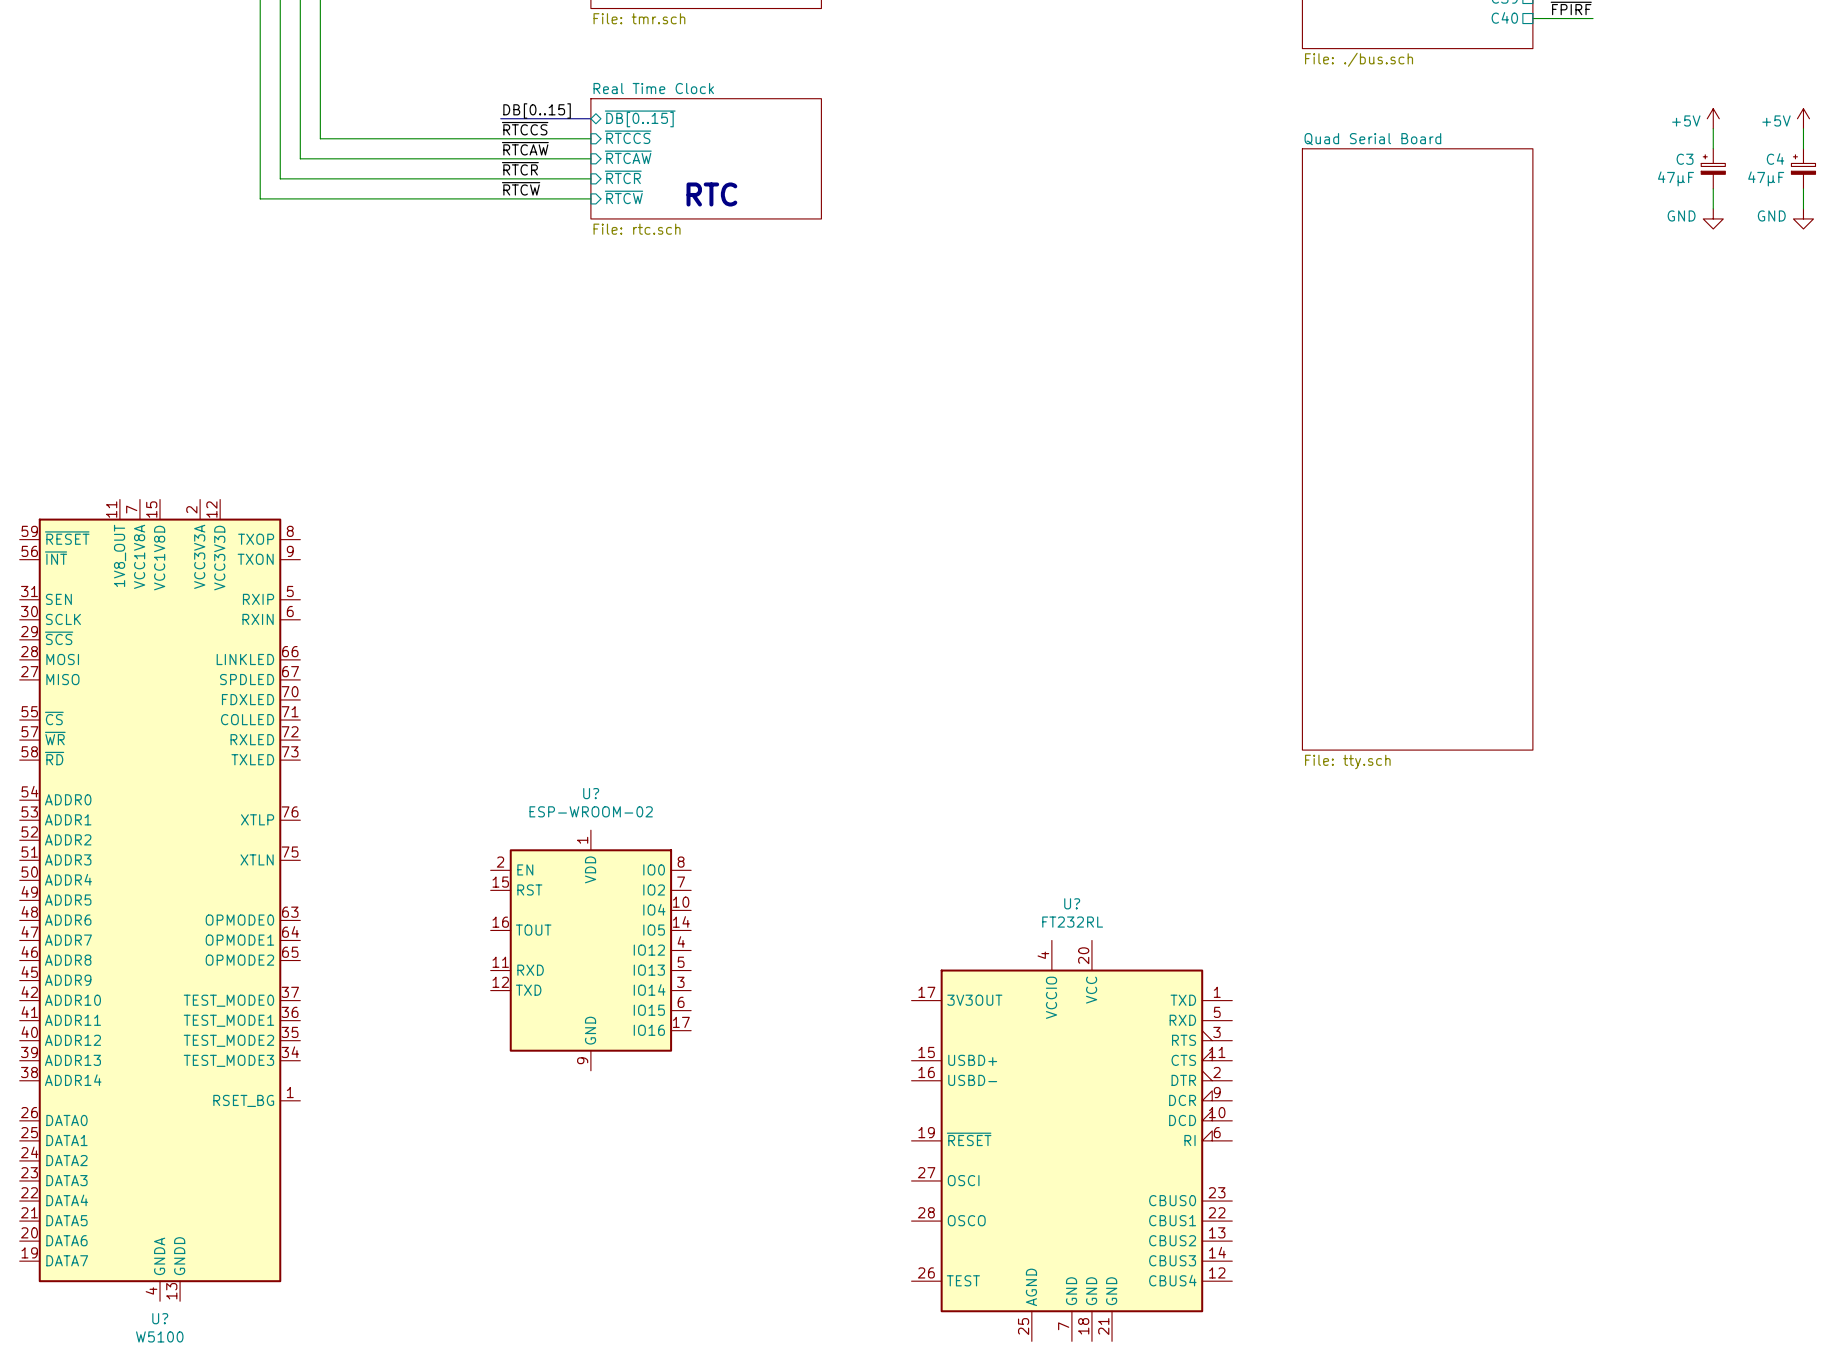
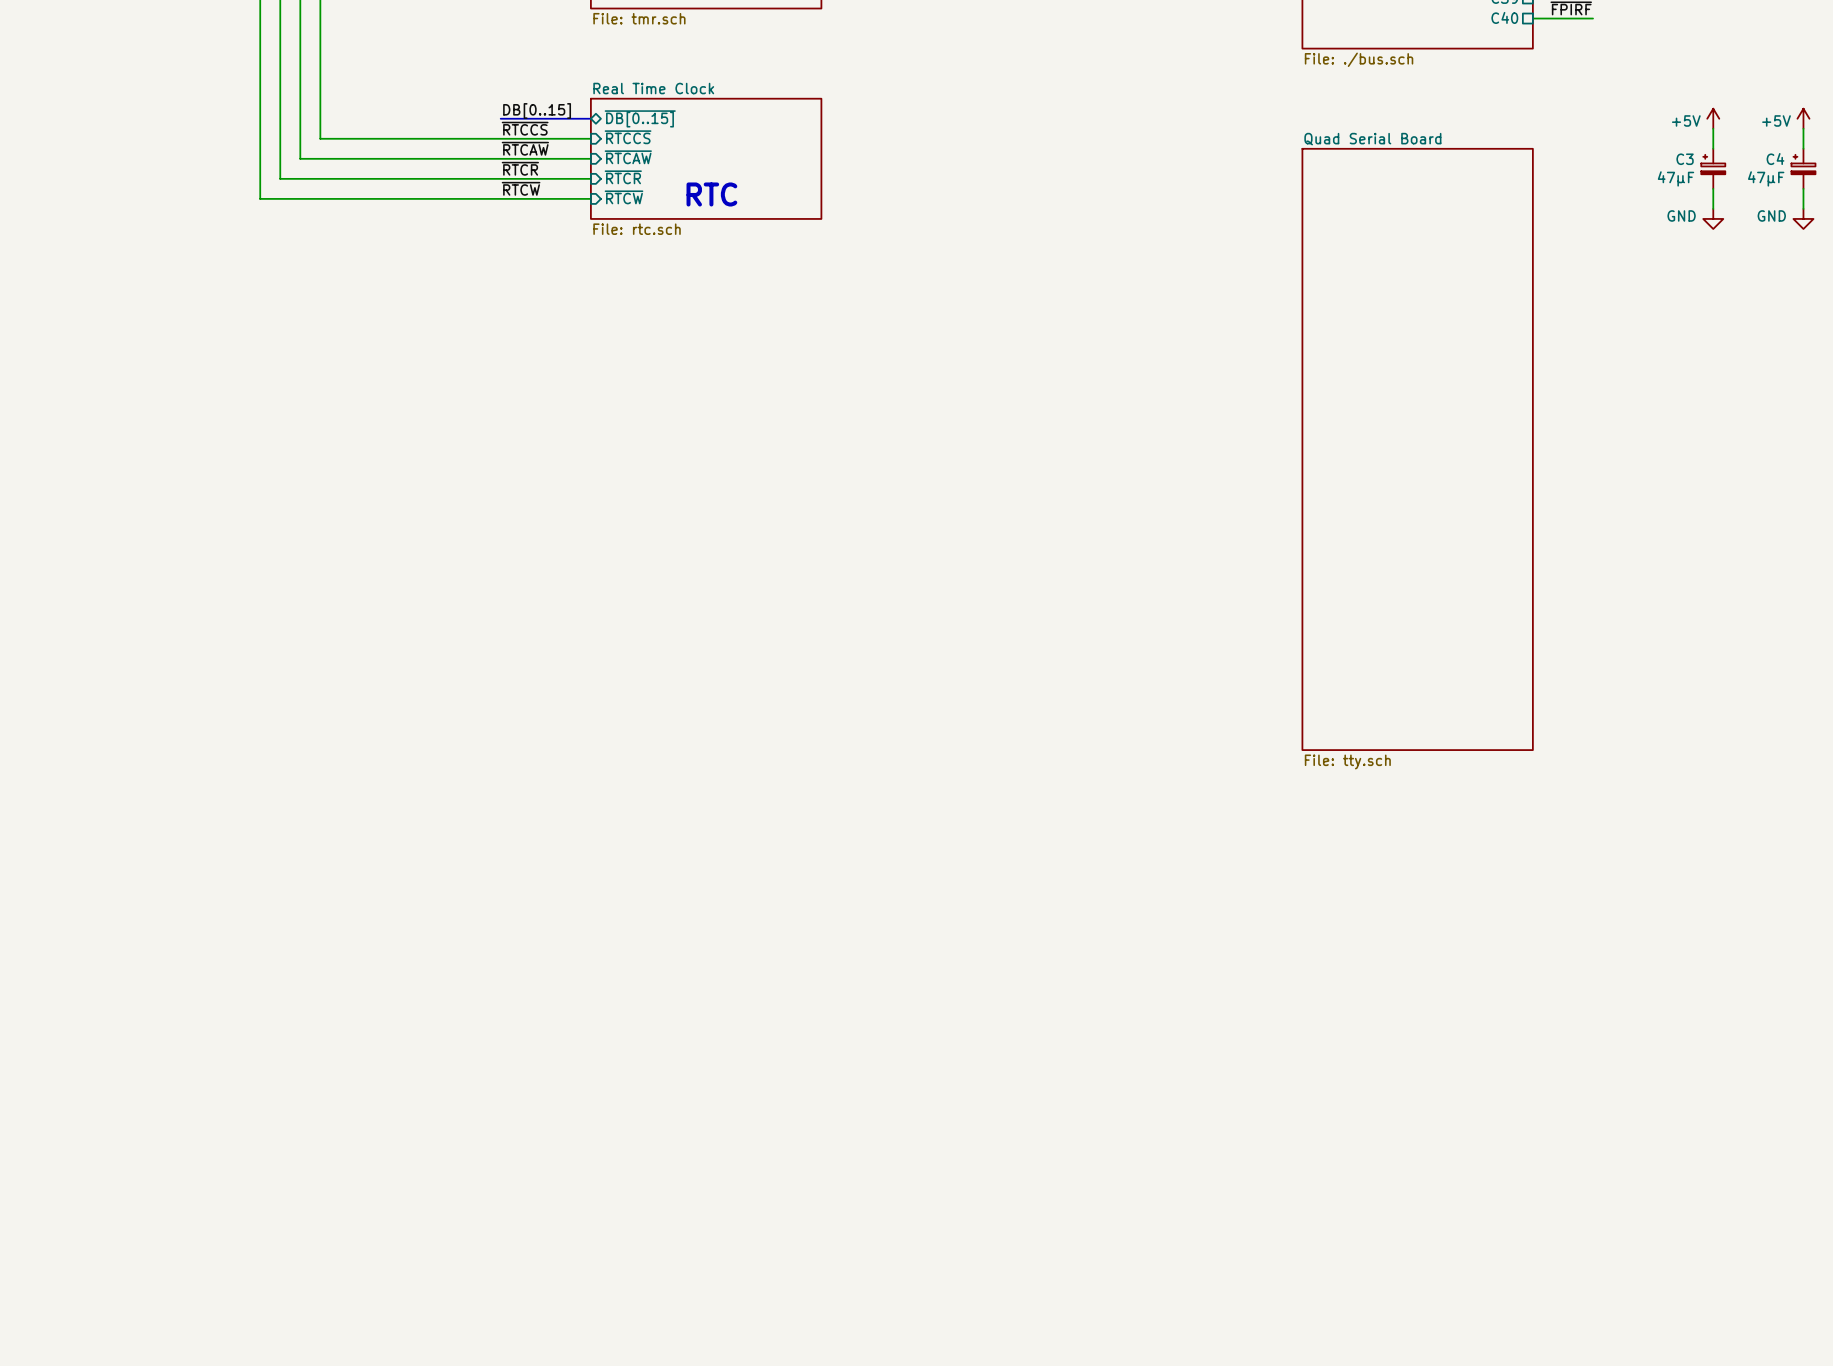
U?: W5100 (160, 900) -> none
U?: ESP-WROOM-02 (590, 950) -> none
U?: FT232RL (1071, 1140) -> none

